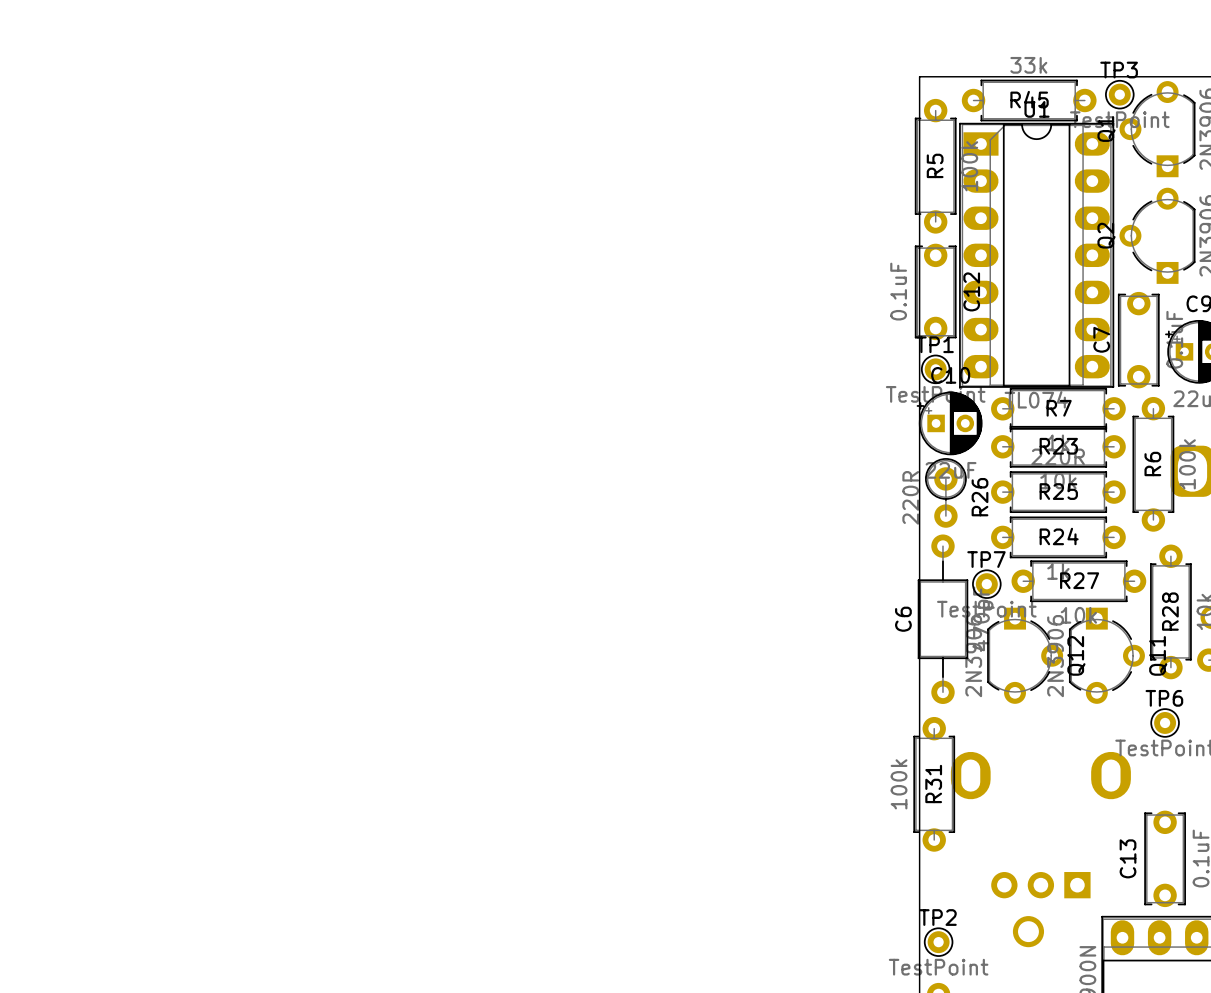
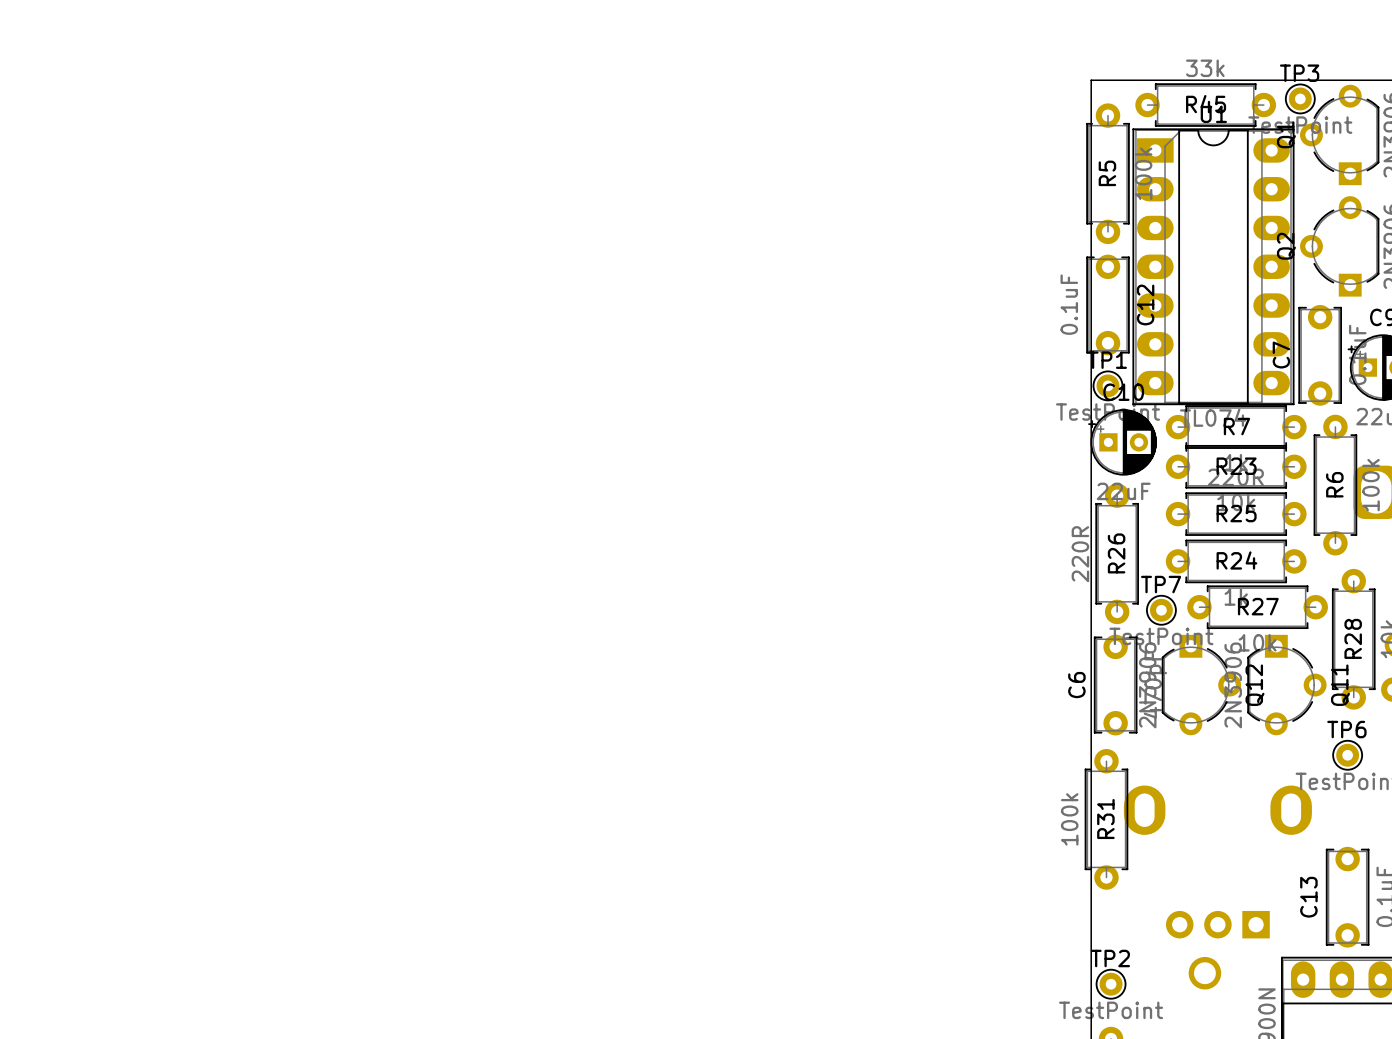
R26 footprint: [925, 458, 967, 528] -> [1095, 483, 1139, 625]
R26 name position: R26 (979, 497) -> R26 (1116, 553)
C6 footprint: [917, 534, 969, 704] -> [1093, 634, 1138, 736]

